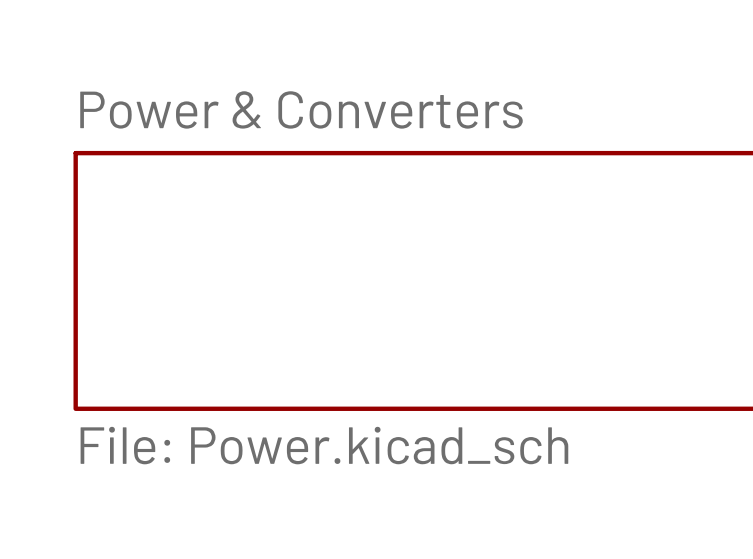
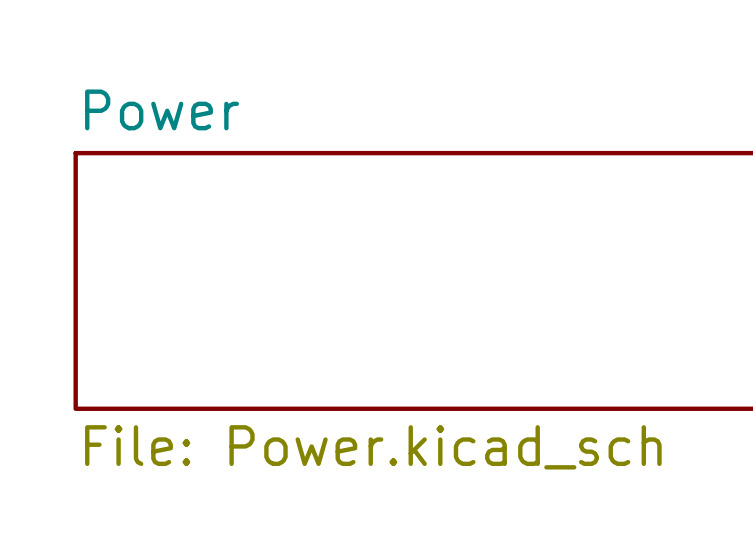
sheet Power & Converters name: Power & Converters (301, 109) -> Power (162, 109)

